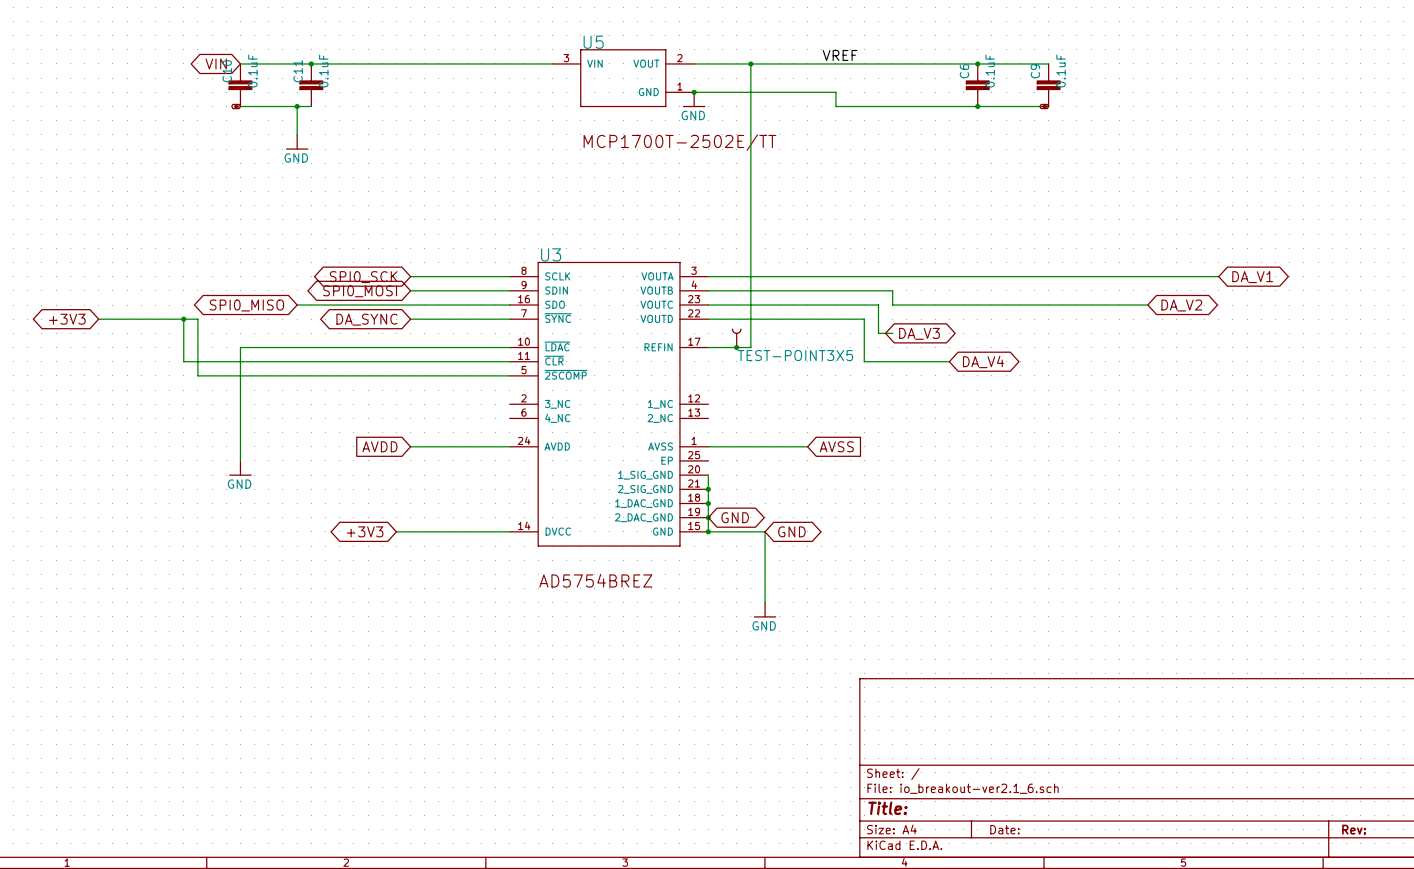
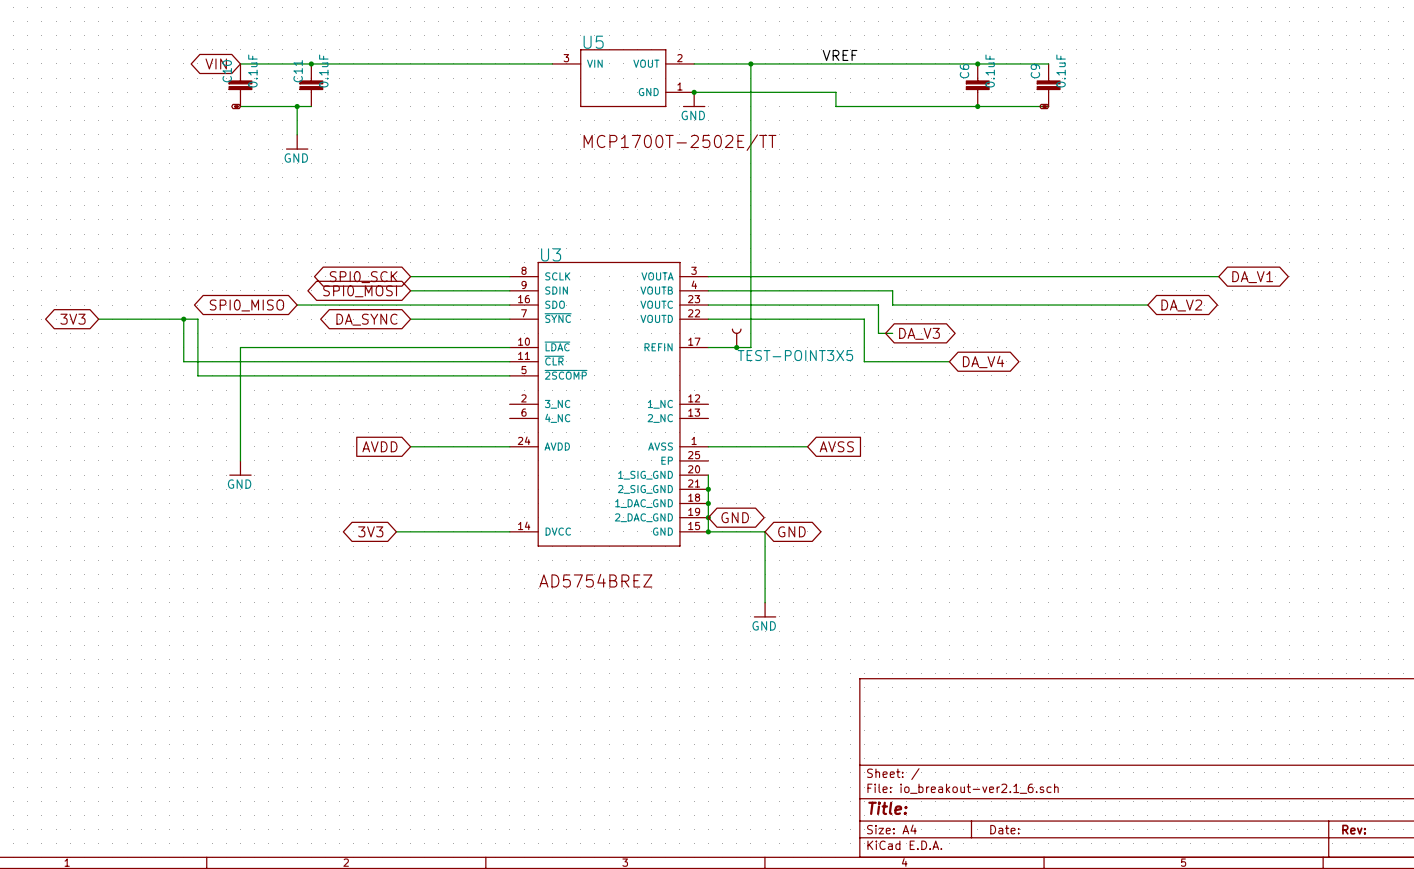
global label: +3V3 (67, 319) -> 3V3 (73, 319)
global label: +3V3 (365, 531) -> 3V3 (370, 531)

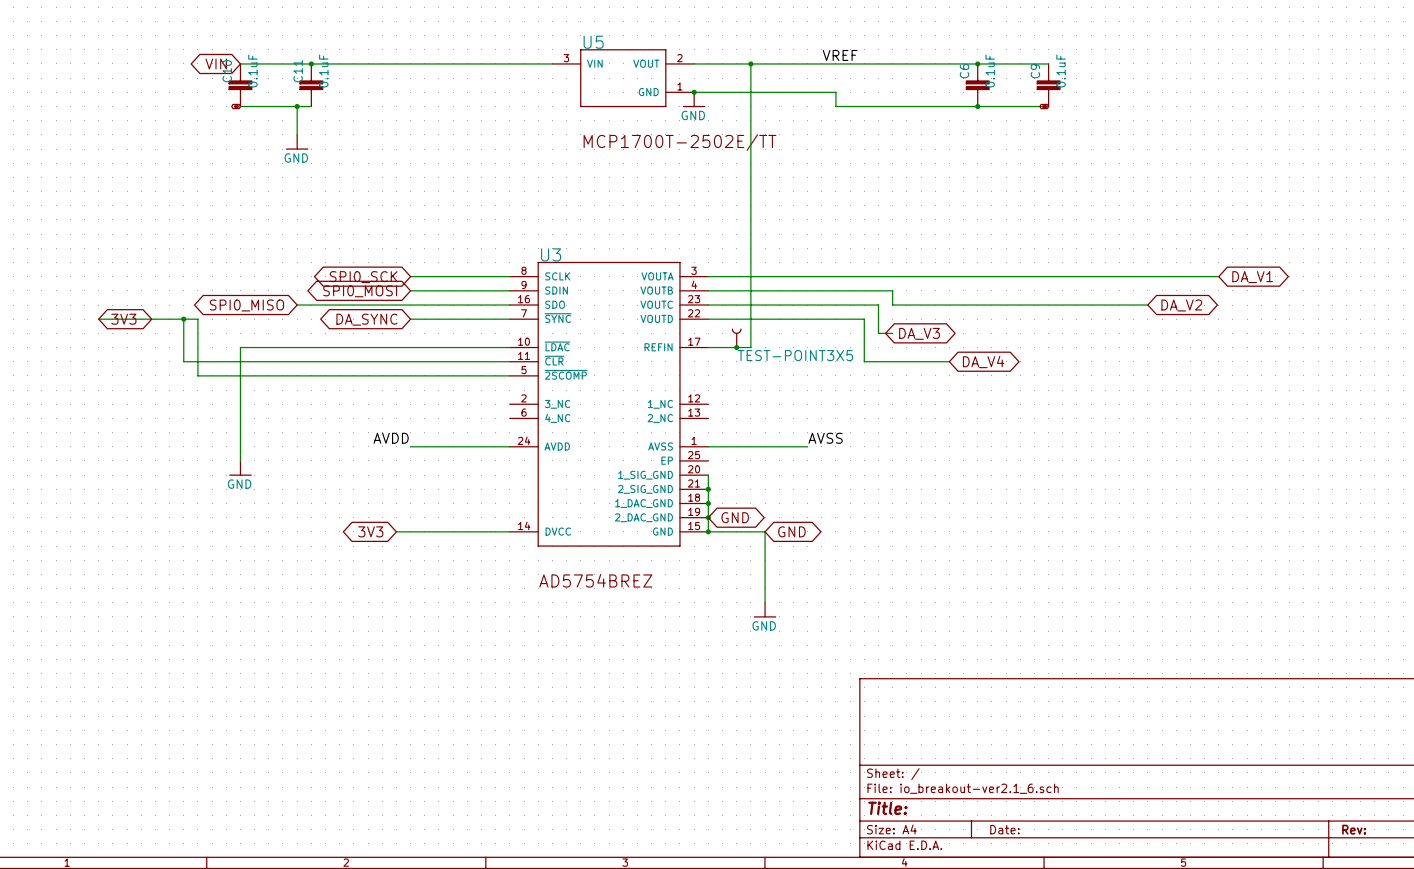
global label rotation: 0° (73, 319) -> 180° (123, 319)
label: none -> AVDD (391, 438)
label: none -> AVSS (825, 438)
global label: AVDD (379, 446) -> none
global label: AVSS (836, 446) -> none

